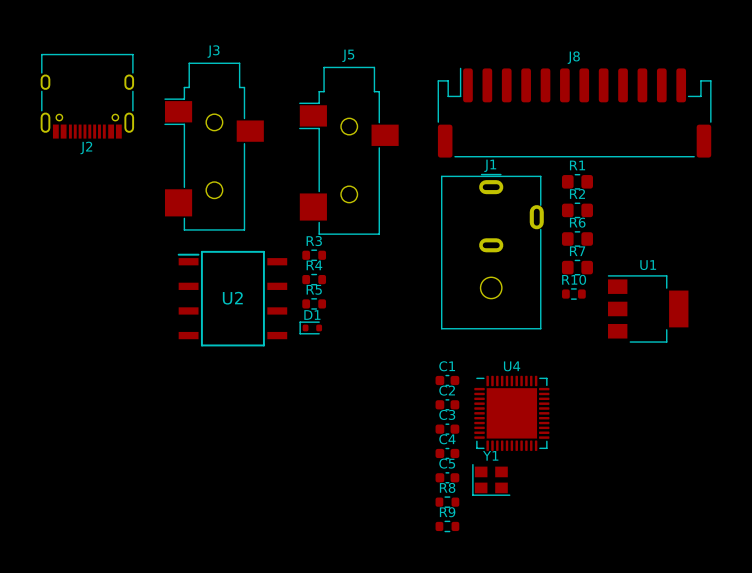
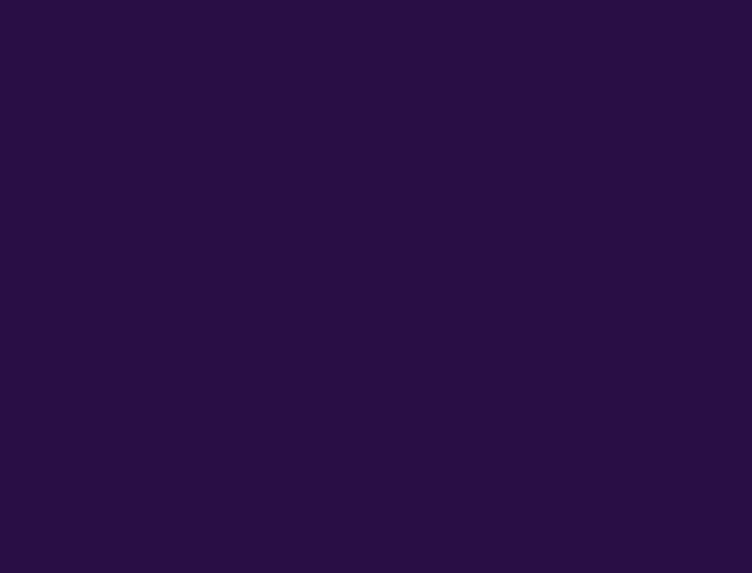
J2: (87, 96) -> none
J8: (574, 112) -> none
J3: (214, 146) -> none
J5: (348, 150) -> none
R1: (577, 181) -> none
R2: (577, 210) -> none
R6: (577, 238) -> none
J1: (492, 251) -> none
R3: (314, 255) -> none
R7: (577, 267) -> none
R4: (314, 279) -> none
R10: (573, 294) -> none
U2: (232, 298) -> none
R5: (314, 303) -> none
U1: (648, 308) -> none
D1: (310, 327) -> none
C1: (447, 380) -> none
C2: (447, 404) -> none
U4: (511, 413) -> none
C3: (447, 429) -> none
C4: (447, 453) -> none
C5: (447, 477) -> none
Y1: (491, 479) -> none
R8: (447, 502) -> none
R9: (447, 526) -> none

